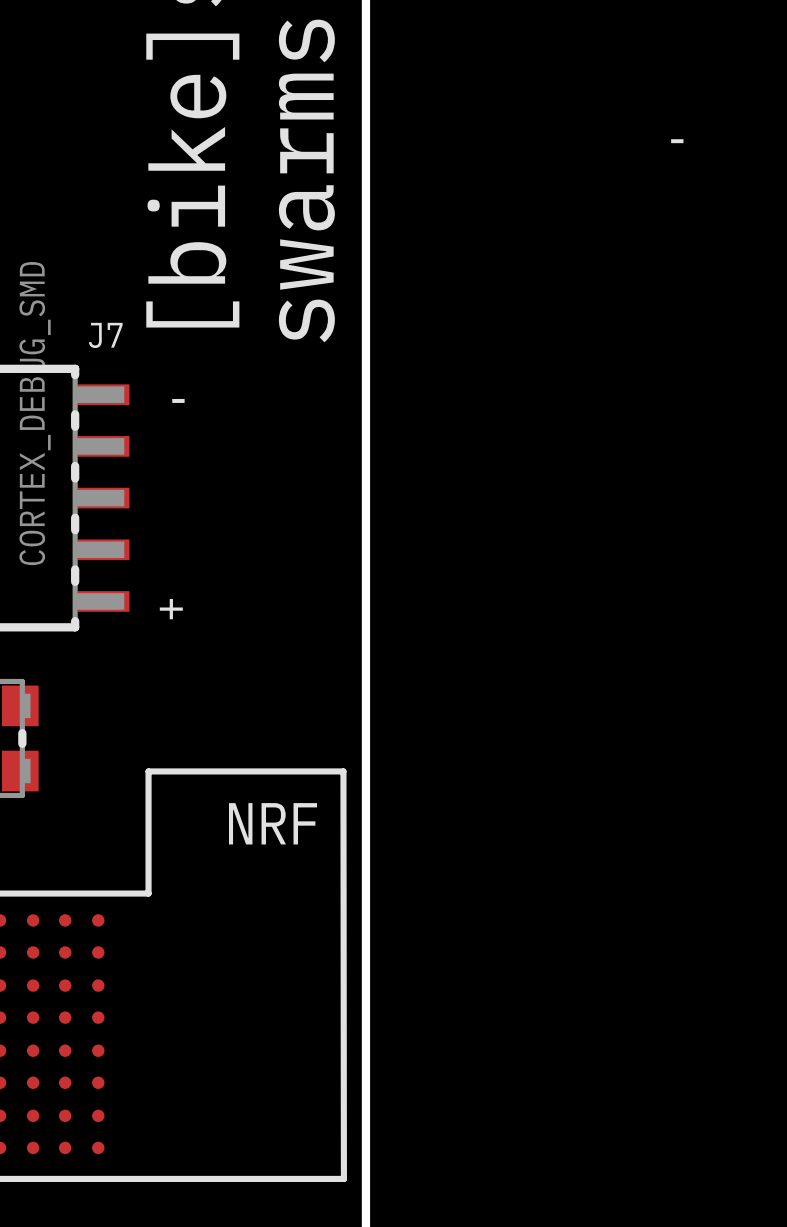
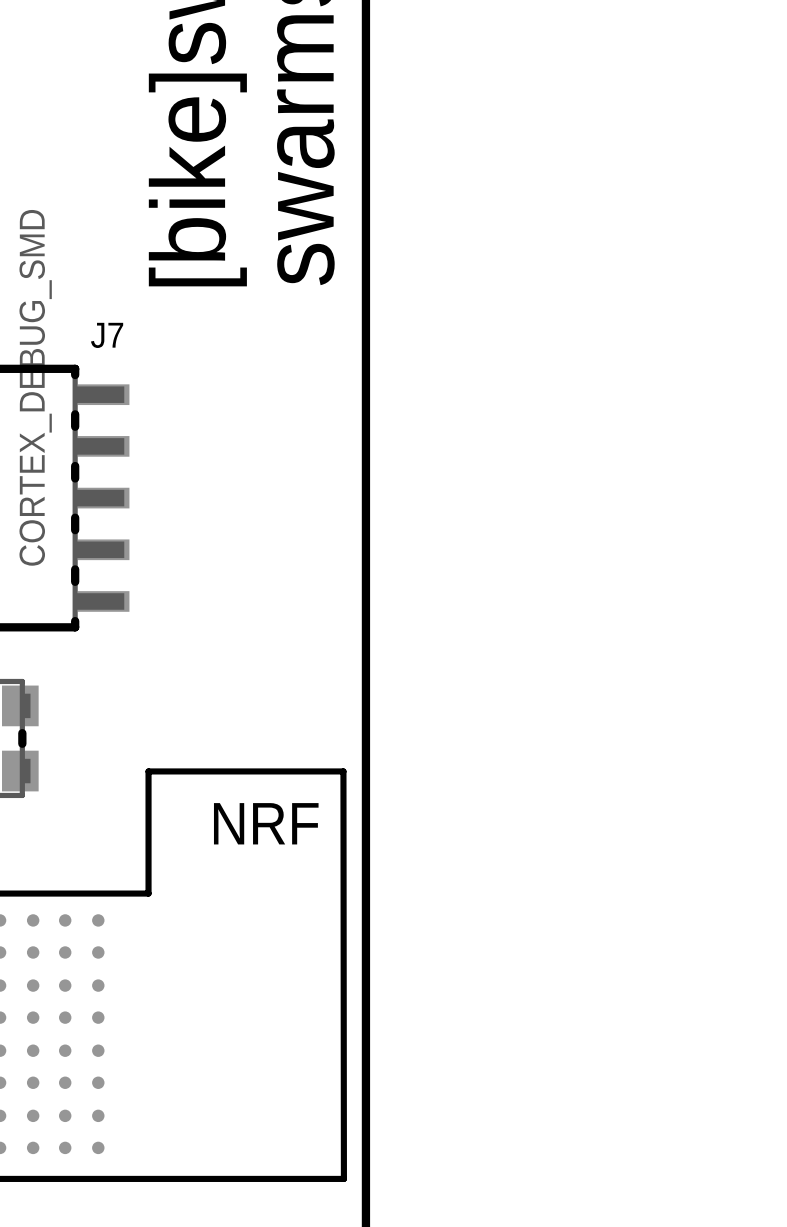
text: - (677, 141) -> none
text: - (178, 400) -> none
text: + (171, 609) -> none

